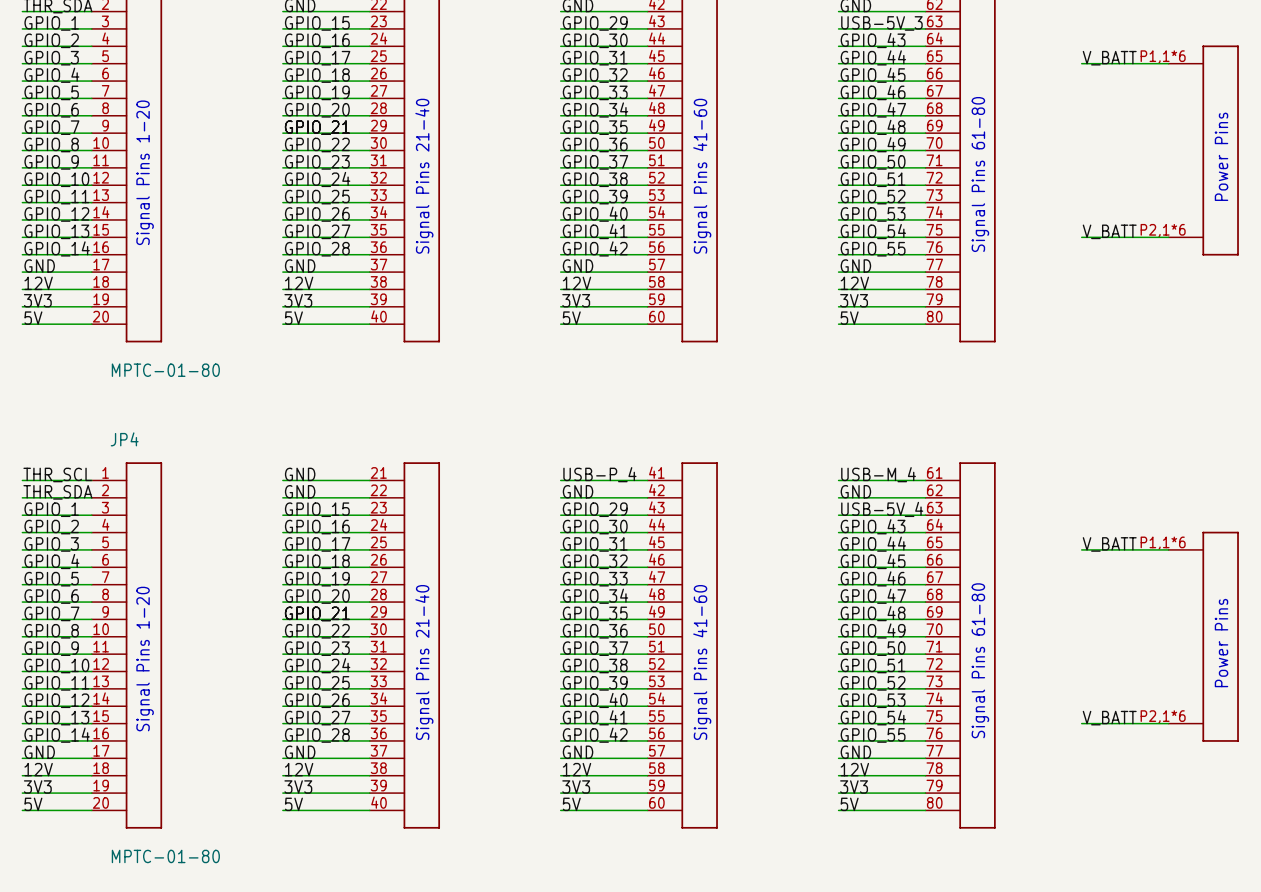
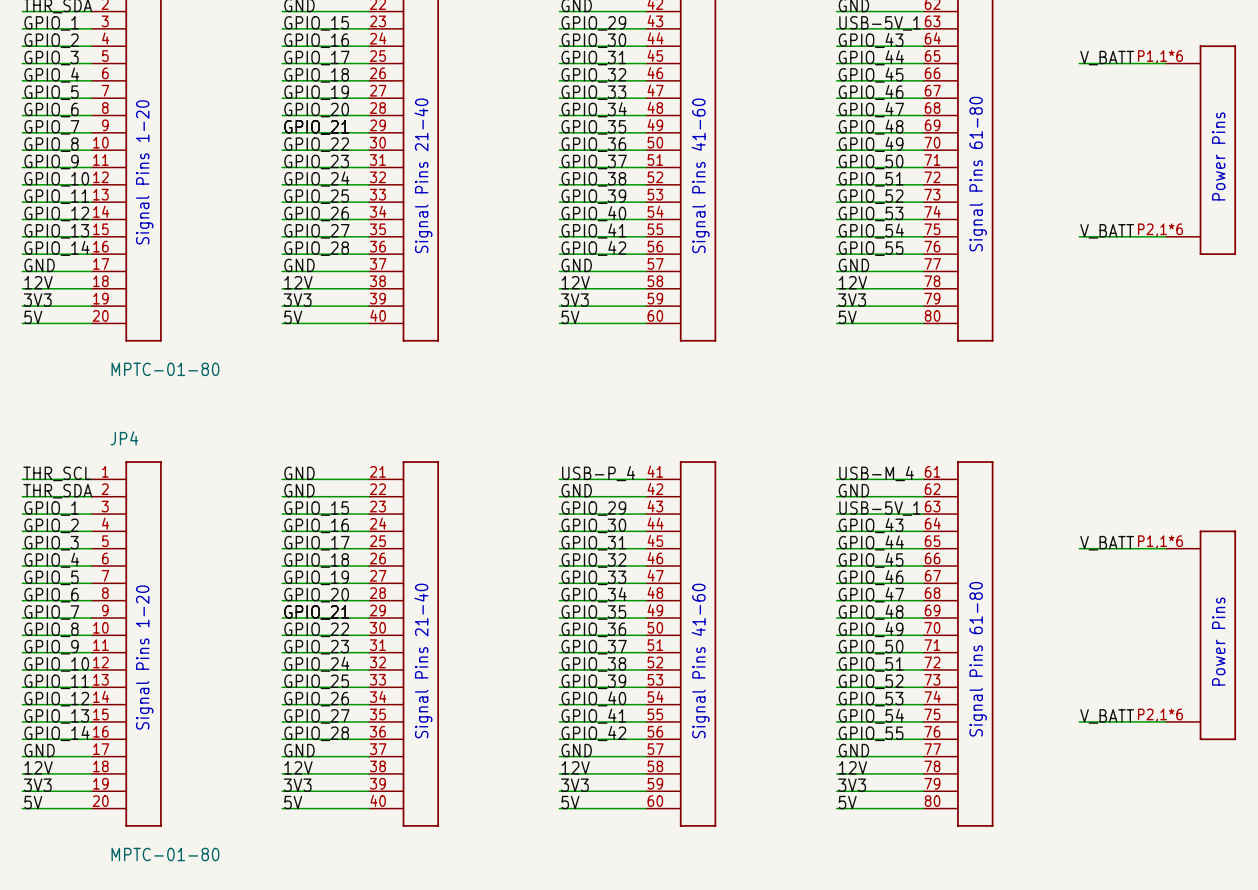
label: USB-5V_3 (881, 23) -> USB-5V_1 (879, 23)
label: USB-5V_4 (882, 509) -> USB-5V_1 (879, 508)

